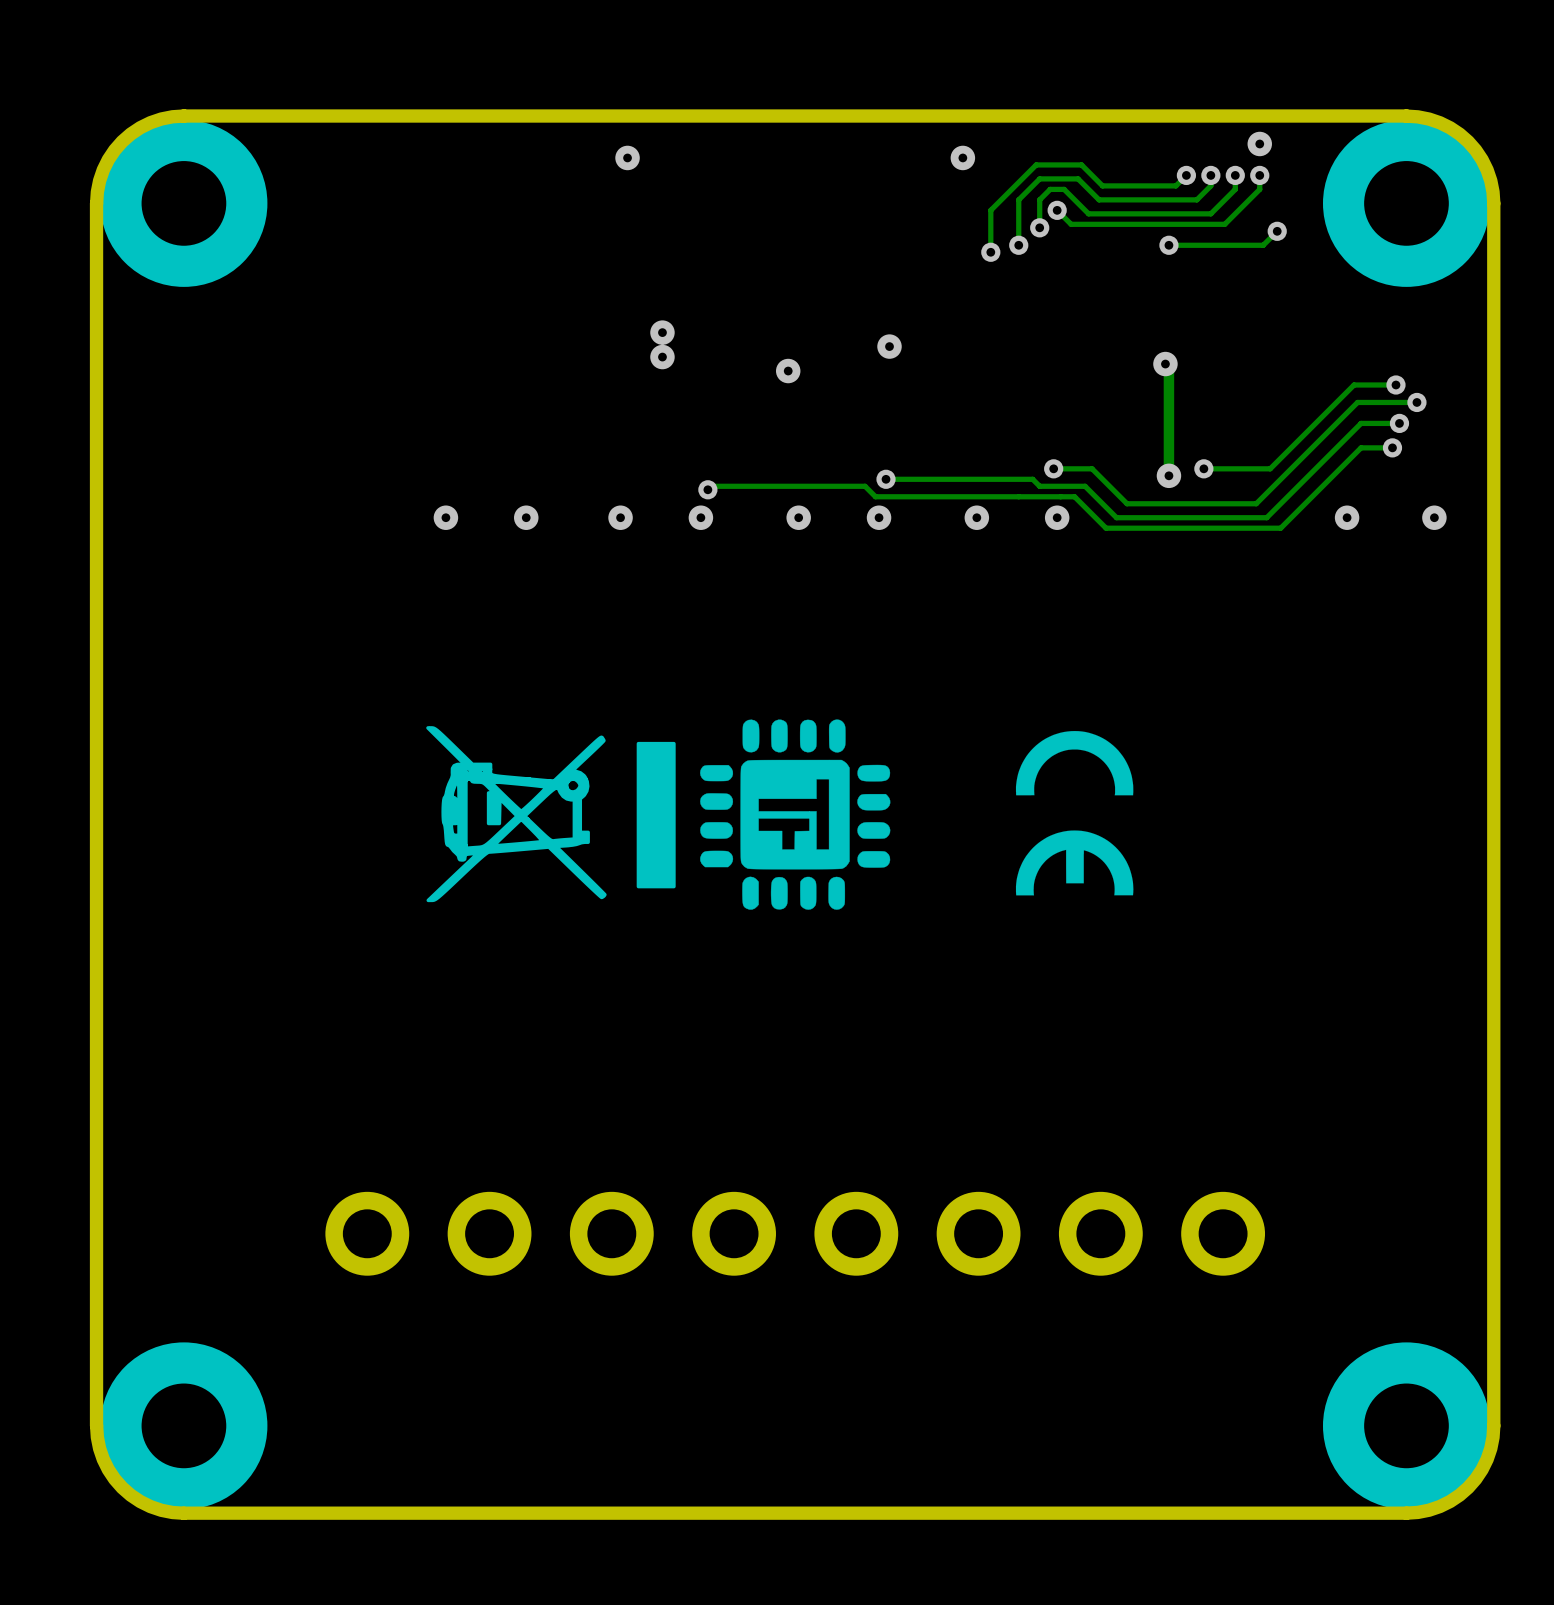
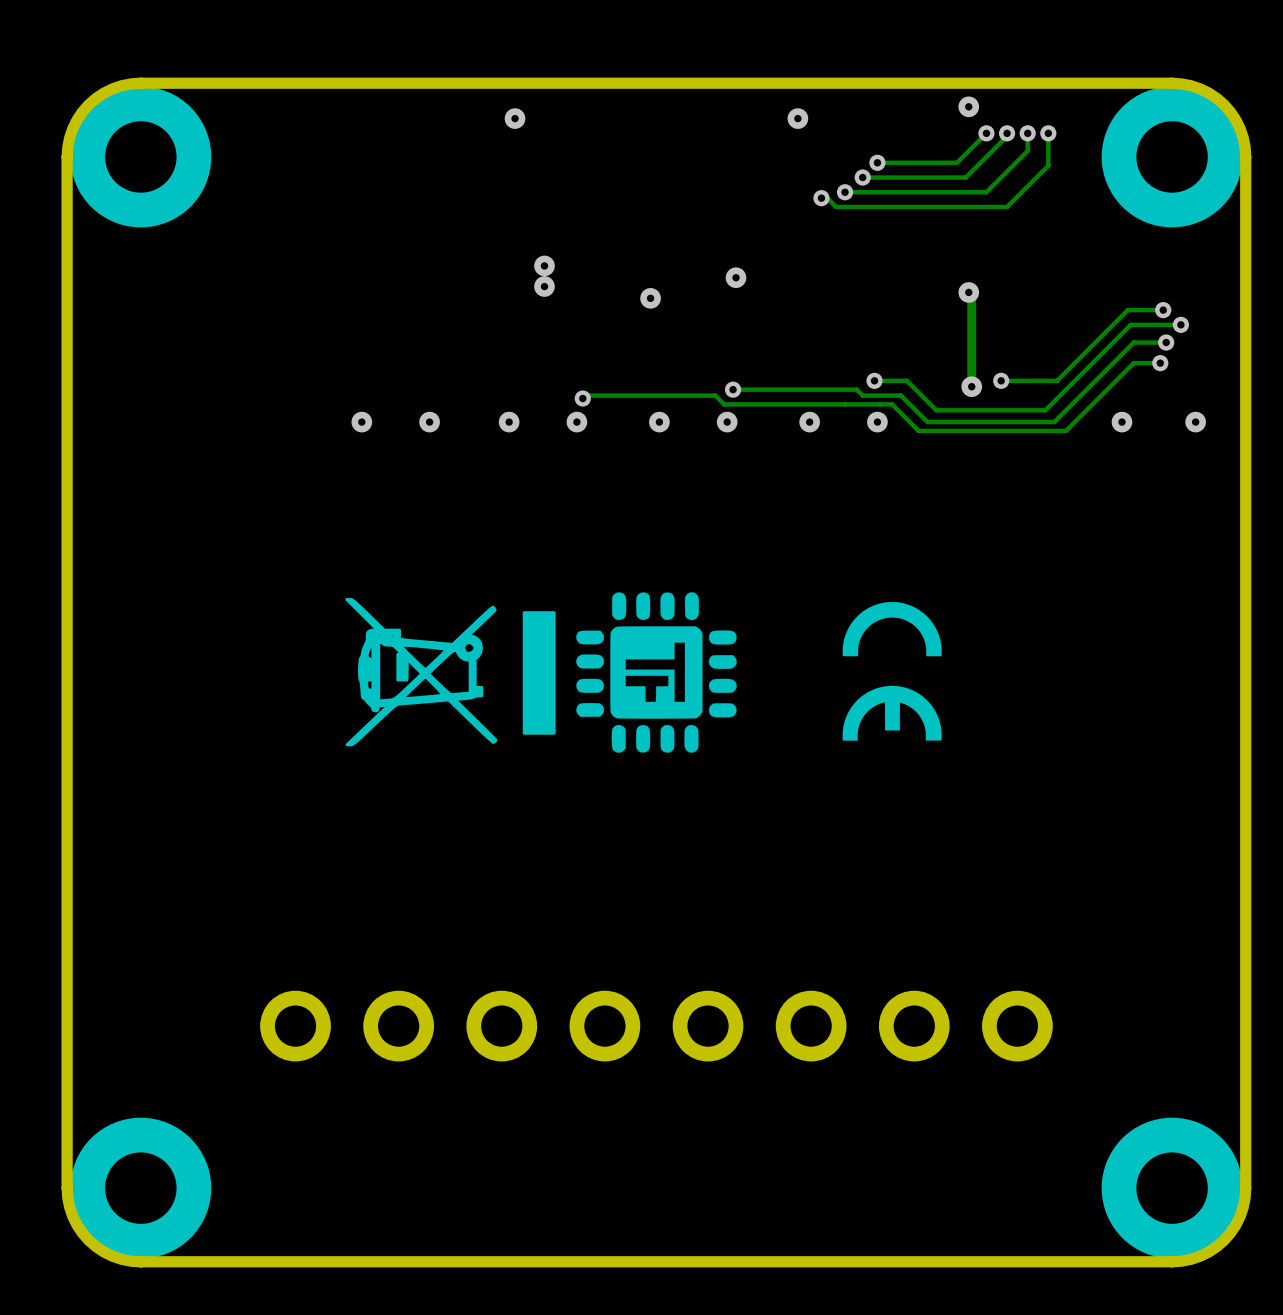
via position: (1259, 143) -> (968, 106)
track: (1210, 178) (1210, 185) (1196, 199) (1099, 199) (1078, 178) (1039, 178) (1018, 199) (1018, 245) -> (971, 192) (845, 192)
track: (1175, 185) (1102, 185) (1081, 164) (1036, 164) (990, 210) (990, 252) -> (977, 142) (956, 162) (877, 162)
track: (1235, 189) (1210, 213) (1088, 213) (1064, 189) (1050, 189) (1039, 199) (1039, 227) -> (1007, 136) (965, 177) (862, 177)
track: (1259, 189) (1224, 224) (1071, 224) (1057, 210) -> (1048, 145) (1048, 165) (1007, 206) (836, 206) (827, 198) (821, 198)
track: (1277, 231) (1263, 245) (1186, 245) -> (1027, 145) (1027, 151) (986, 192)
via: (1277, 231) -> none
via: (1168, 245) -> none

